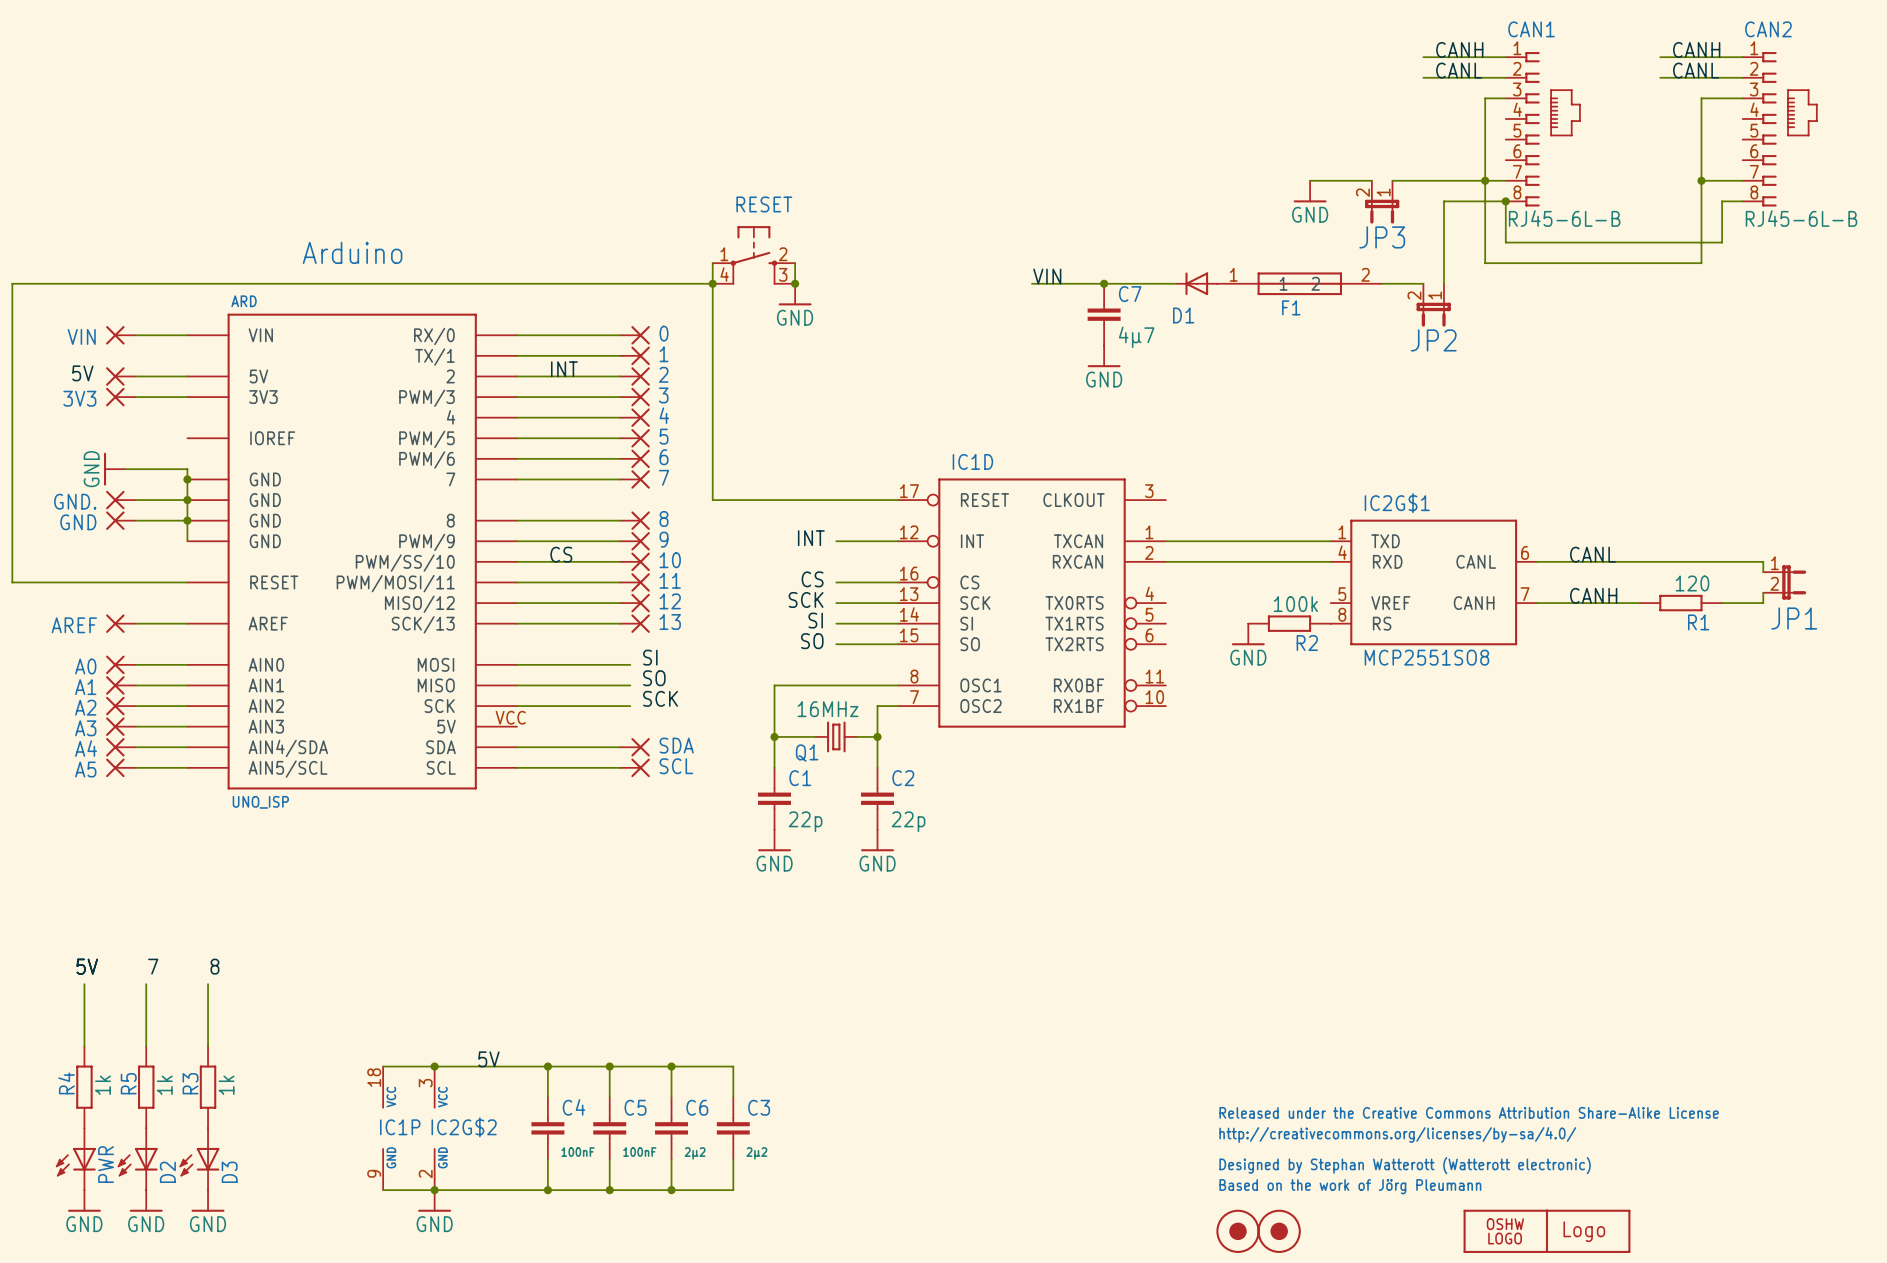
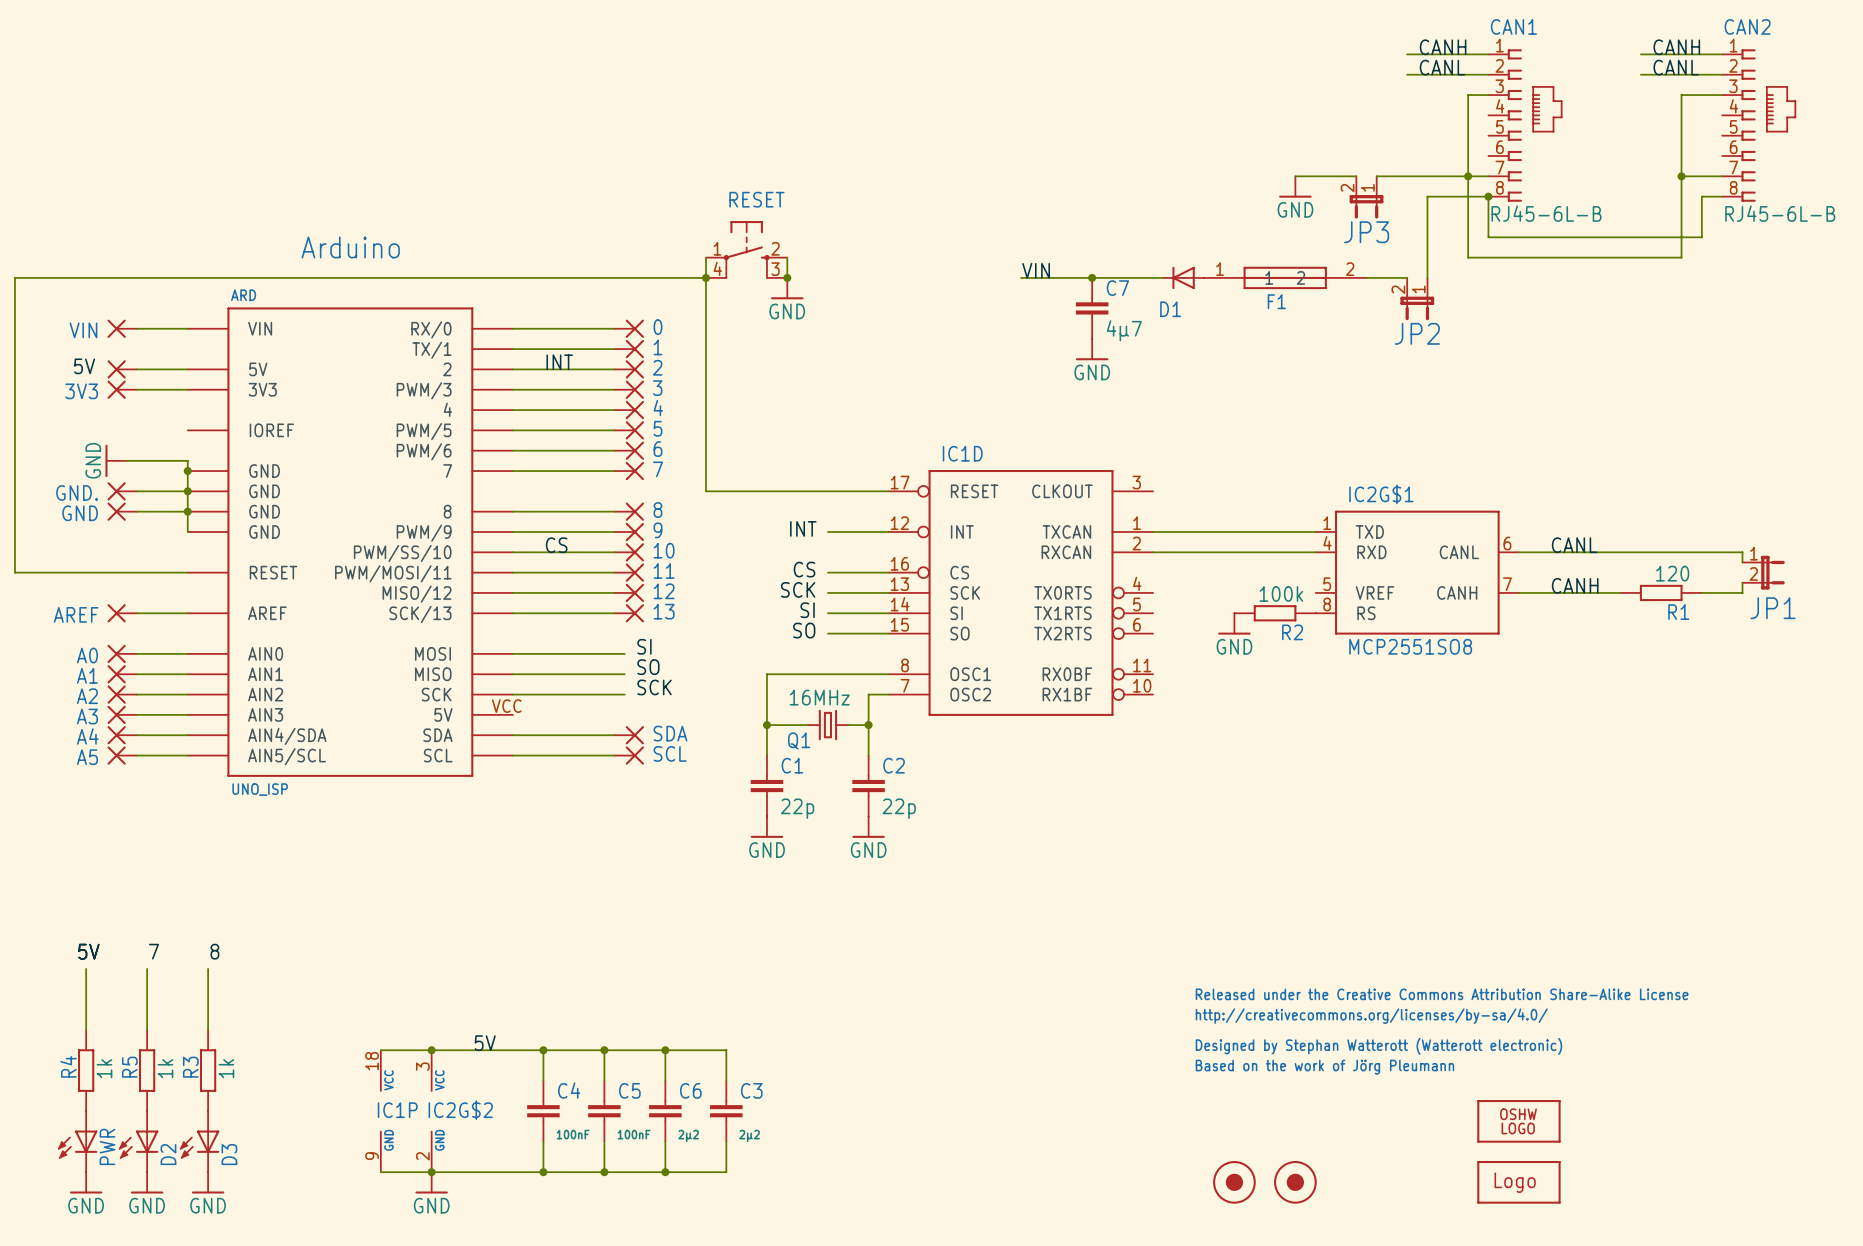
text position: Released under the Creative Commons Attribution Share-Alike License (1469, 1112) -> Released under the Creative Commons Attribution Share-Alike License (1442, 994)
text position: http://creativecommons.org/licenses/by-sa/4.0/ (1397, 1134) -> http://creativecommons.org/licenses/by-sa/4.0/ (1371, 1016)
text position: Designed by Stephan Watterott (Watterott electronic) (1405, 1165) -> Designed by Stephan Watterott (Watterott electronic) (1378, 1046)
text position: Based on the work of Jörg Pleumann (1350, 1186) -> Based on the work of Jörg Pleumann (1324, 1067)
part: none -> (1234, 1182)
part: none -> (1295, 1182)
part: (1238, 1231) -> none
part: (1279, 1231) -> none
part position: (1505, 1231) -> (1518, 1121)
part position: (1588, 1231) -> (1518, 1182)

